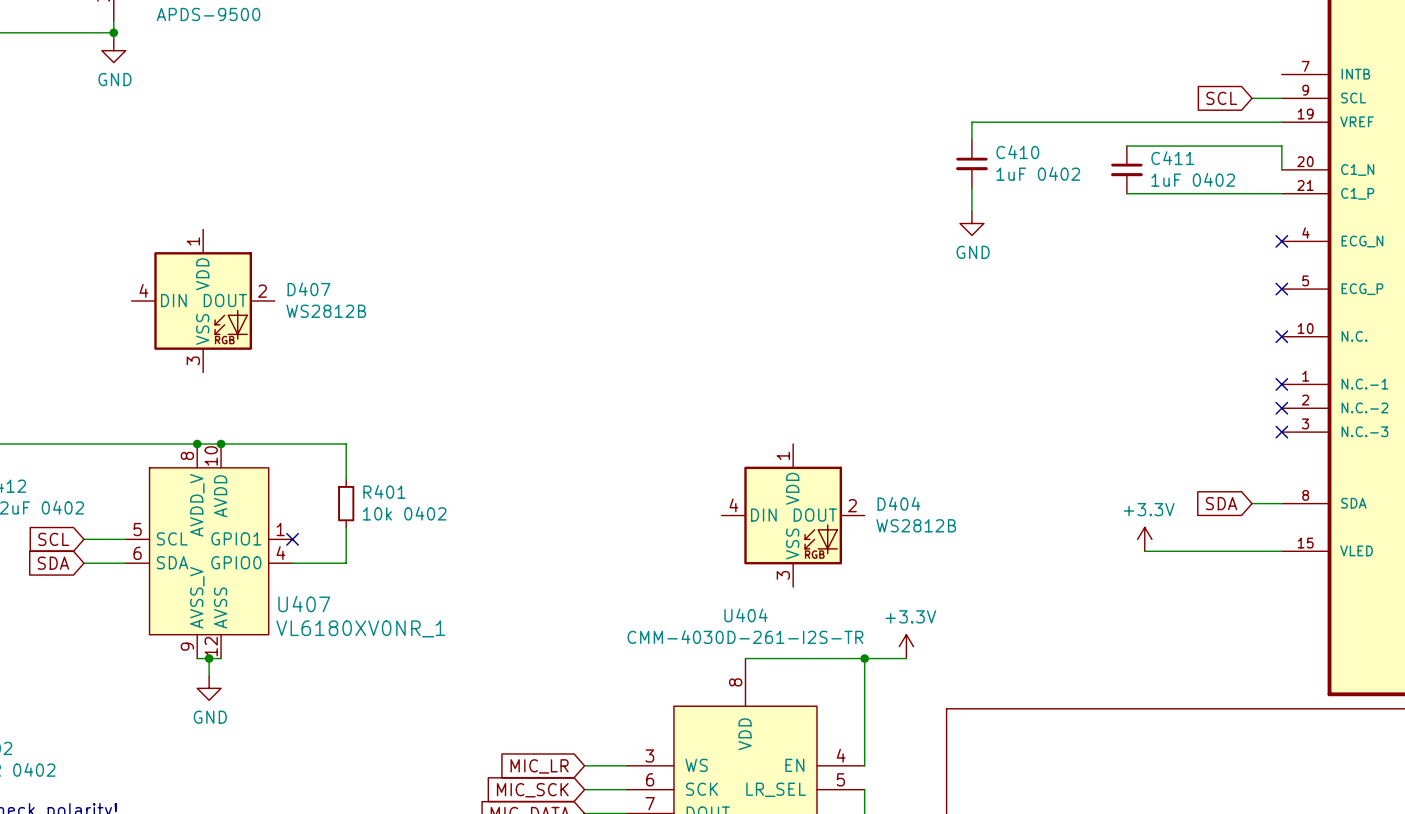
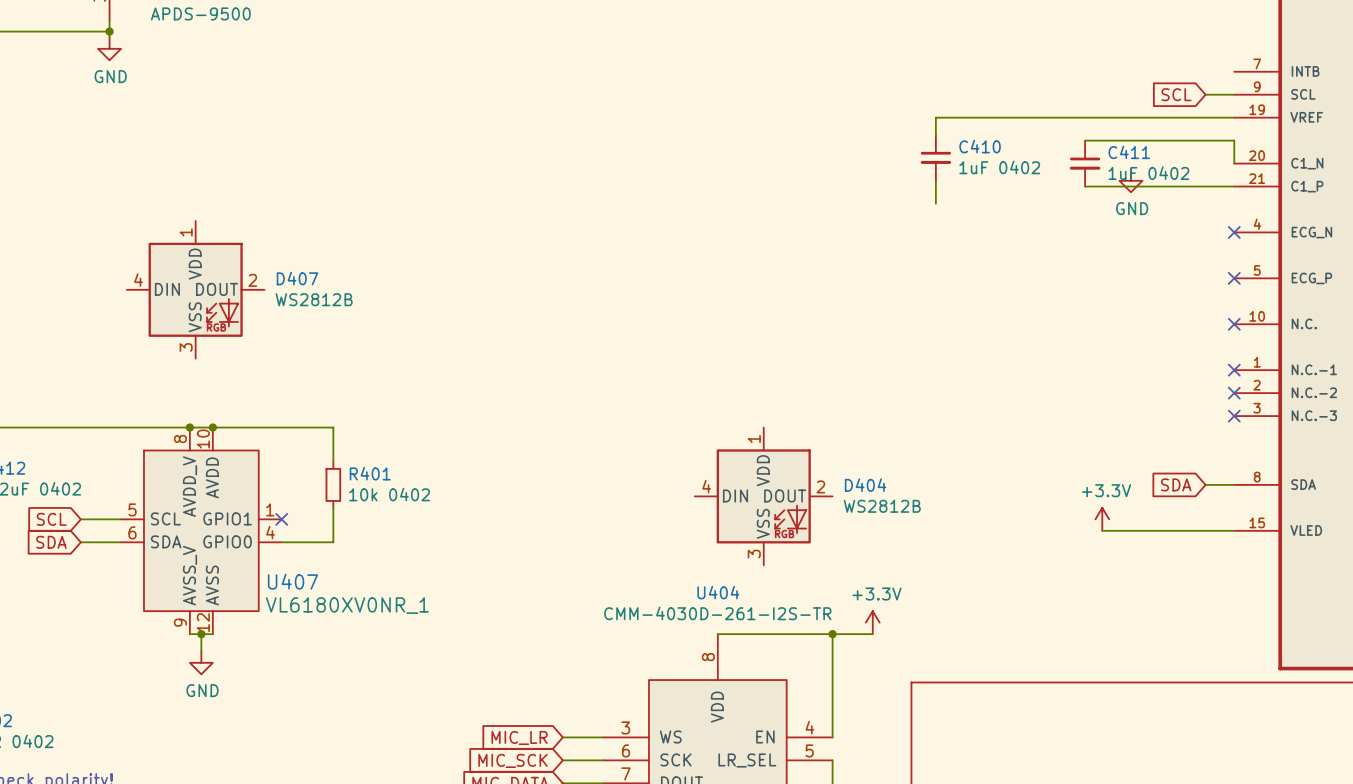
power symbol: none -> GND (1130, 180)
power symbol: GND (971, 223) -> none

